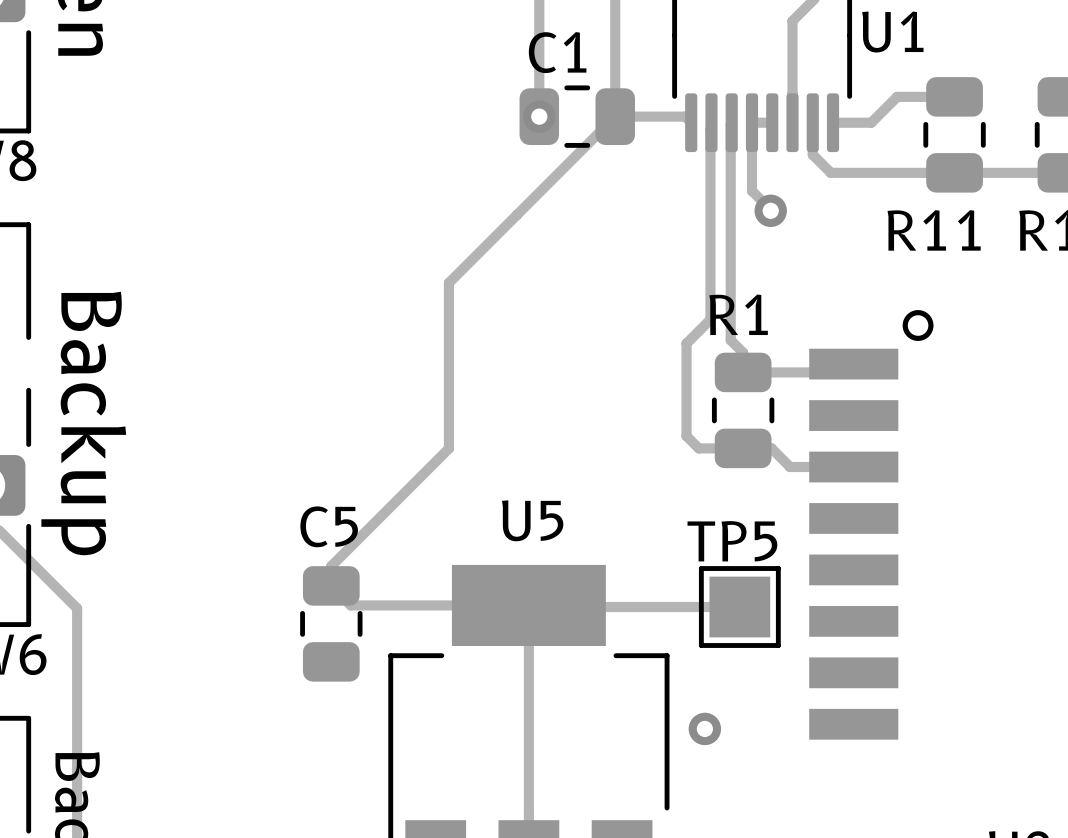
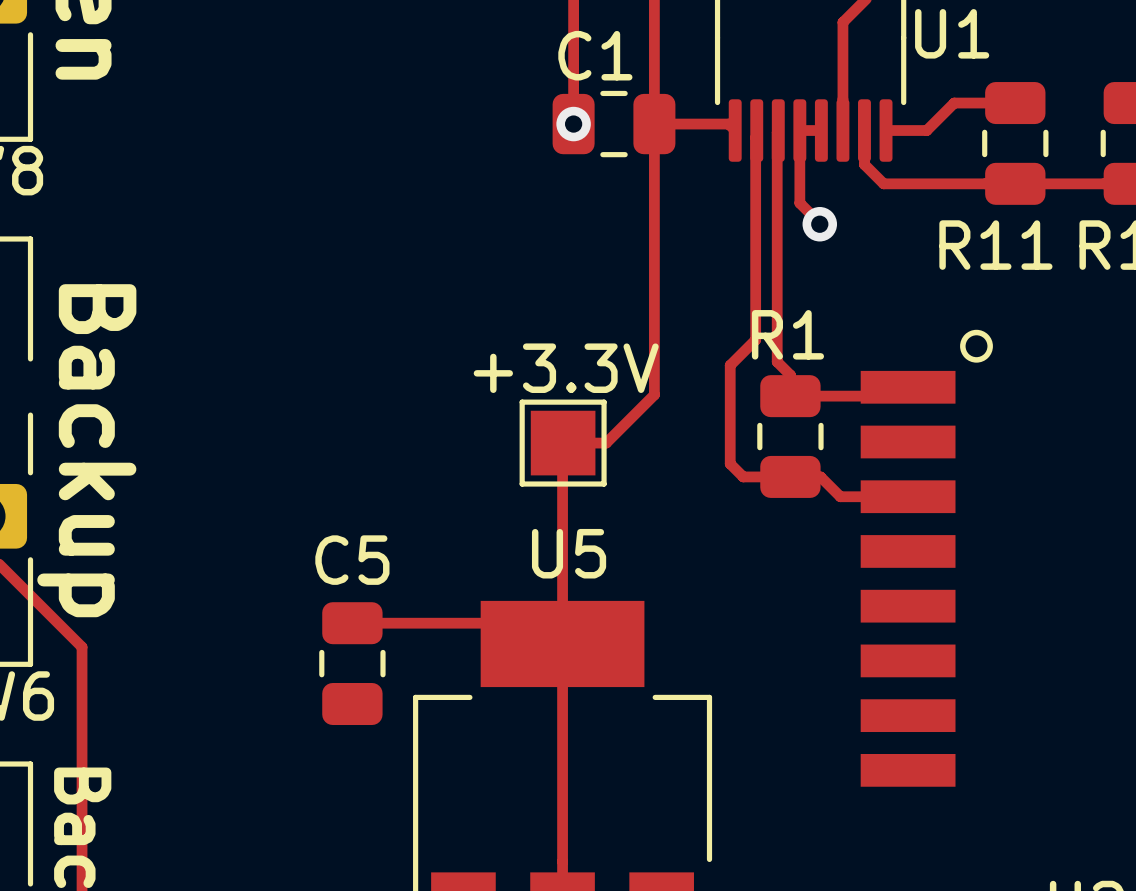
track: (615, 116) (448, 282) (448, 448) (331, 566) (331, 585) (350, 605) (528, 605) -> (654, 124) (654, 394) (606, 443) (563, 443)
text: none -> +3.3V (566, 368)
part: none -> (563, 443)
track: none -> (562, 443) (562, 643) (541, 623) (352, 623)
track: (530, 607) (739, 607) -> none
TP5: (739, 607) -> none
via: (704, 728) -> none

